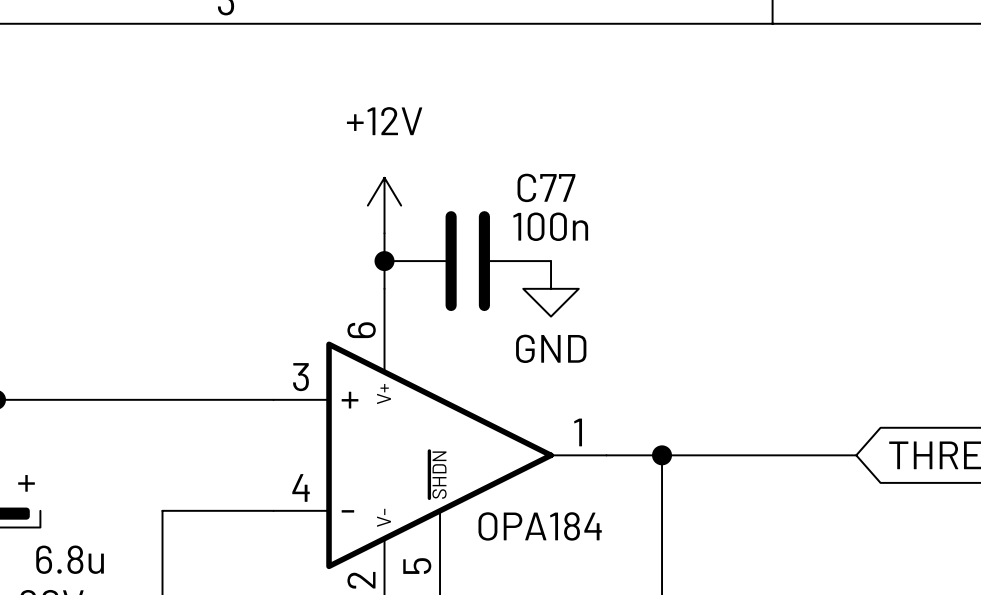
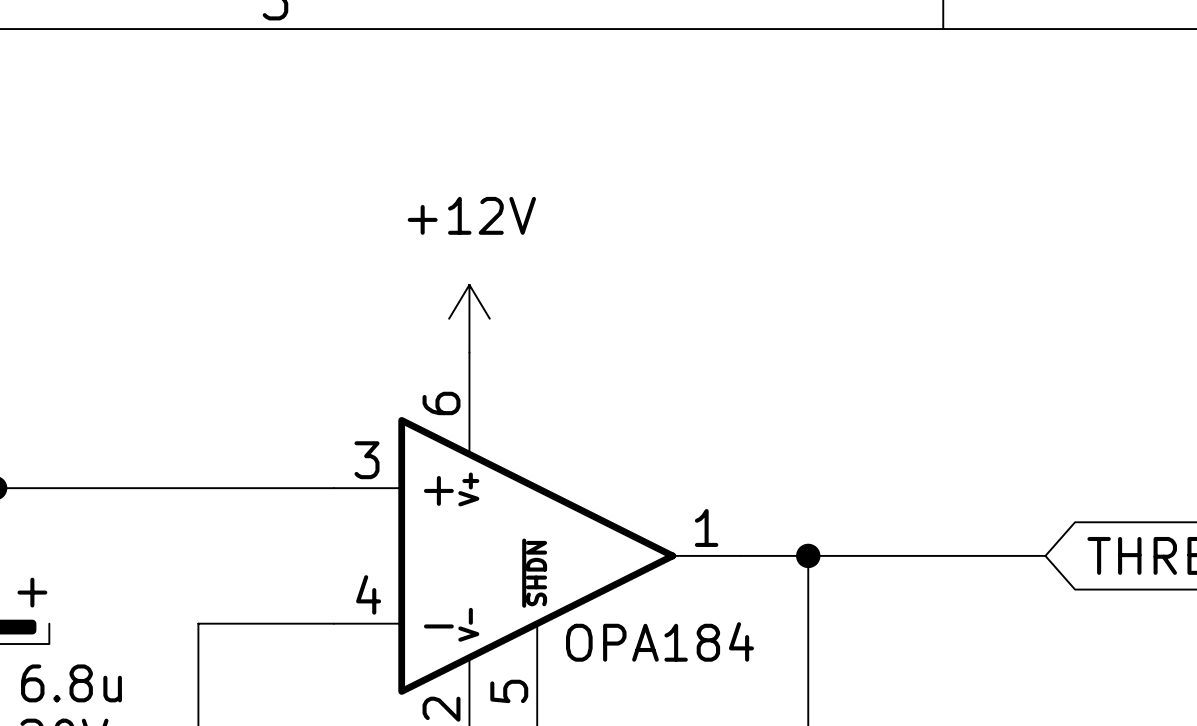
power symbol position: +12V (384, 205) -> +12V (469, 318)
junction: (384, 261) -> none
C77: 100n (467, 261) -> none
power symbol: GND (551, 288) -> none

